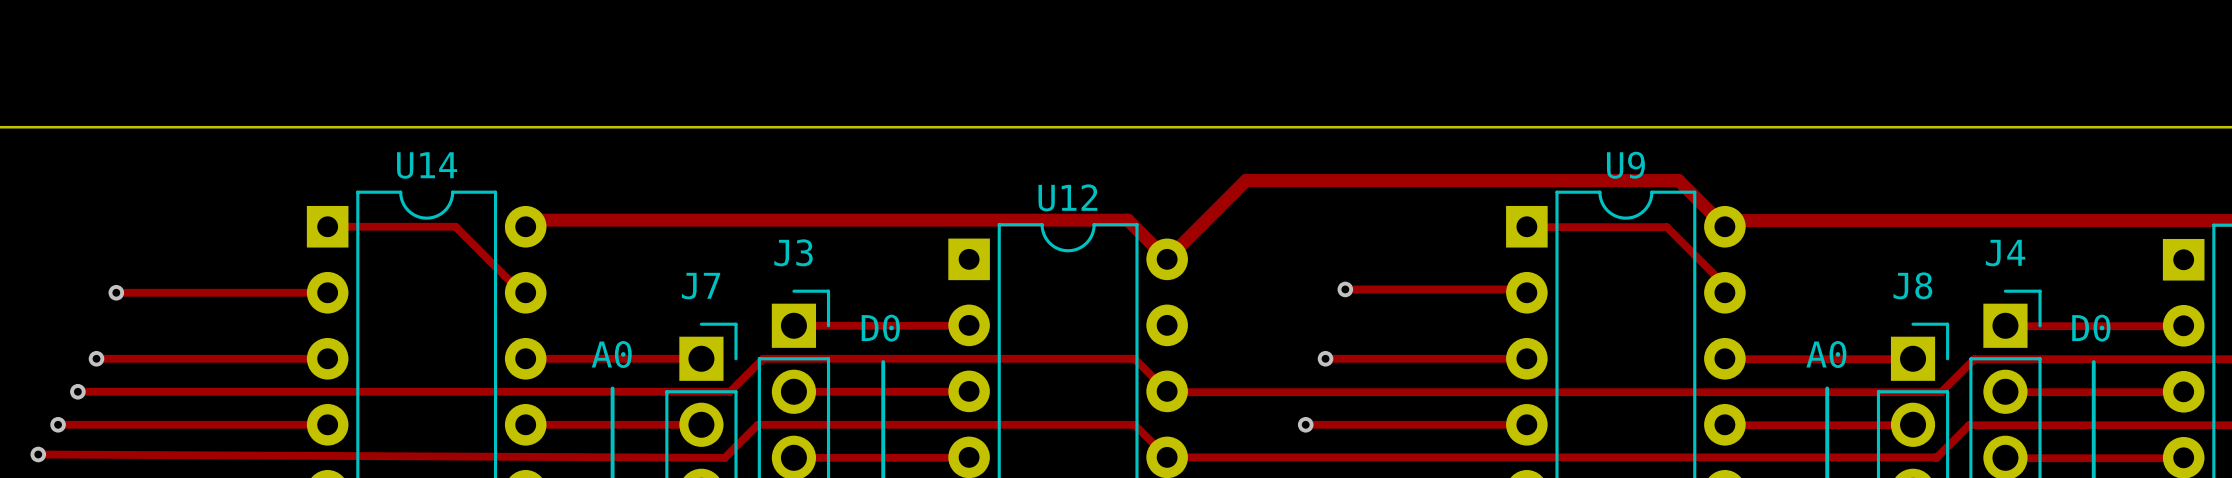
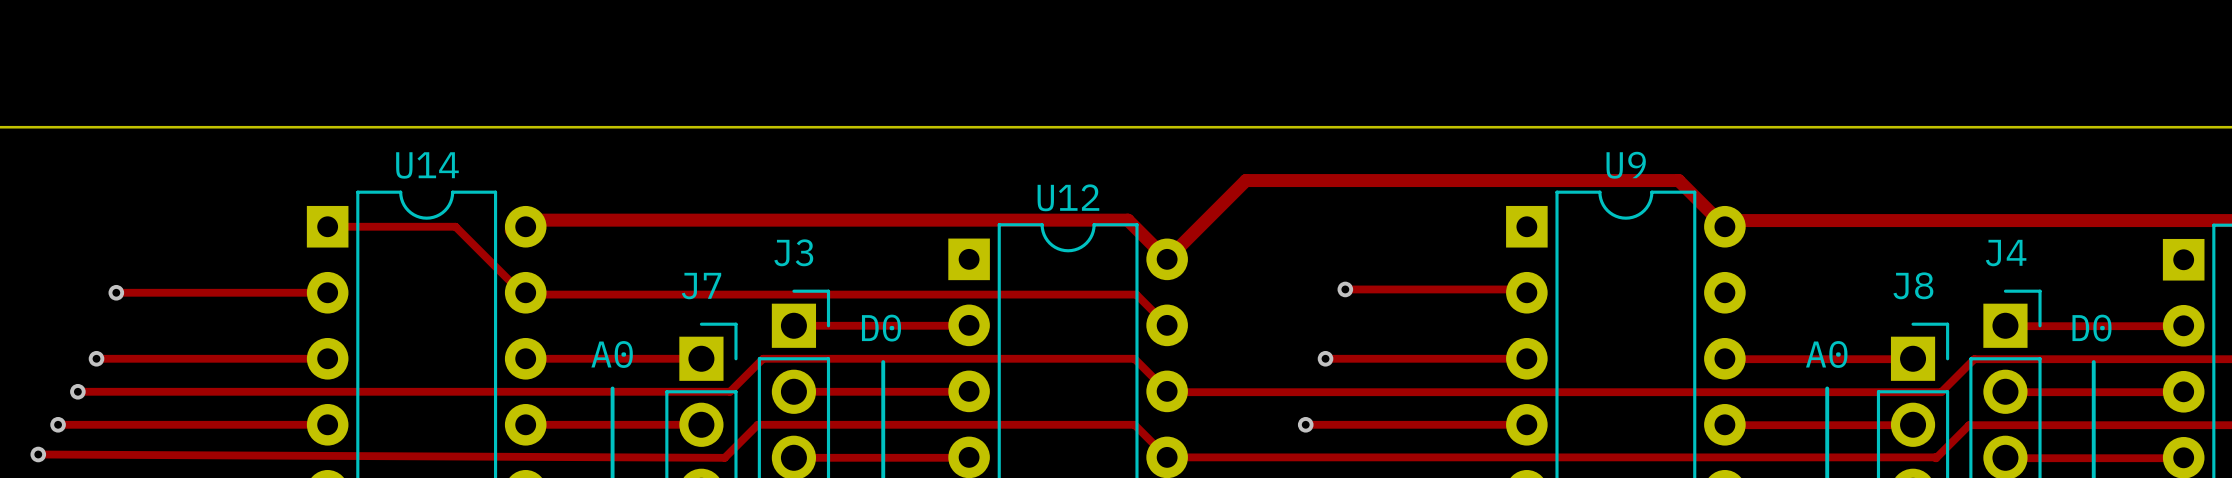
track: (1534, 227) (1666, 227) (1732, 293) -> none
track: none -> (527, 294) (1136, 294) (1167, 325)

